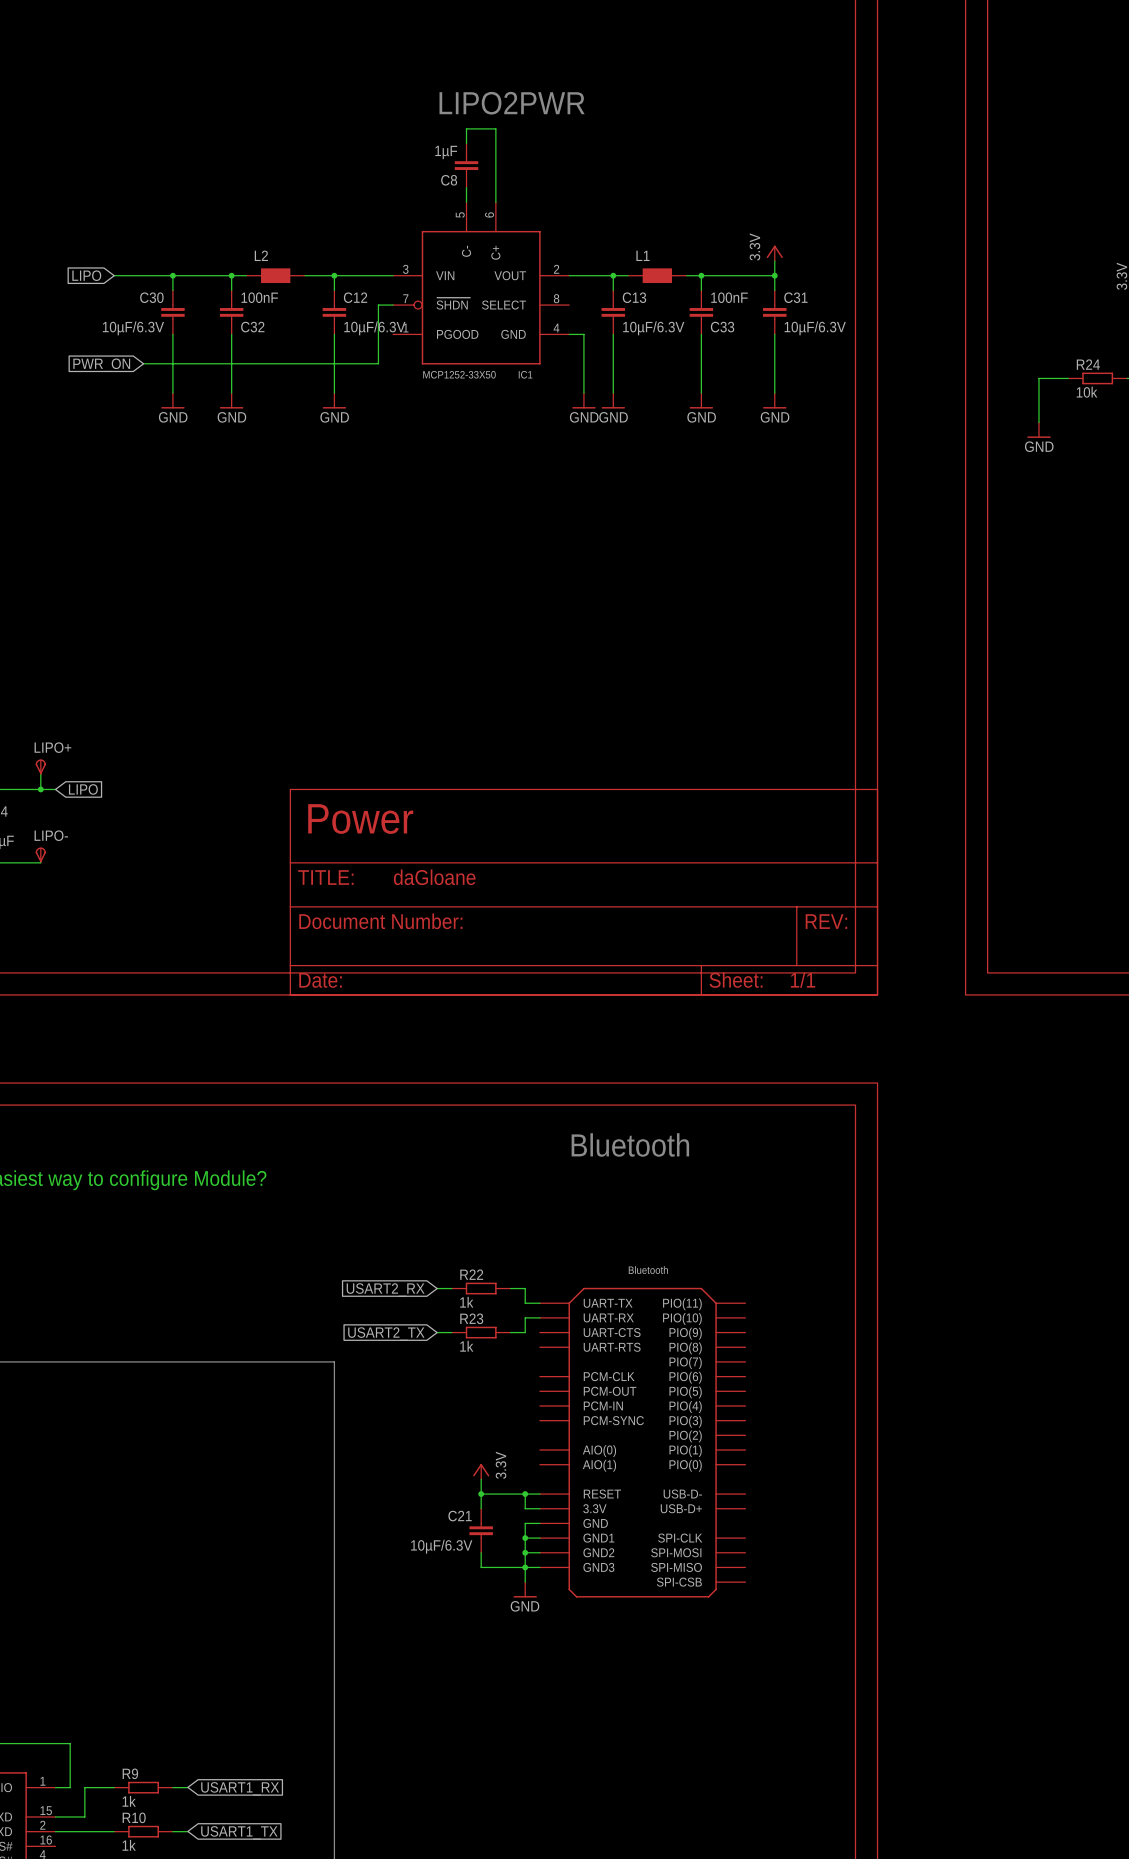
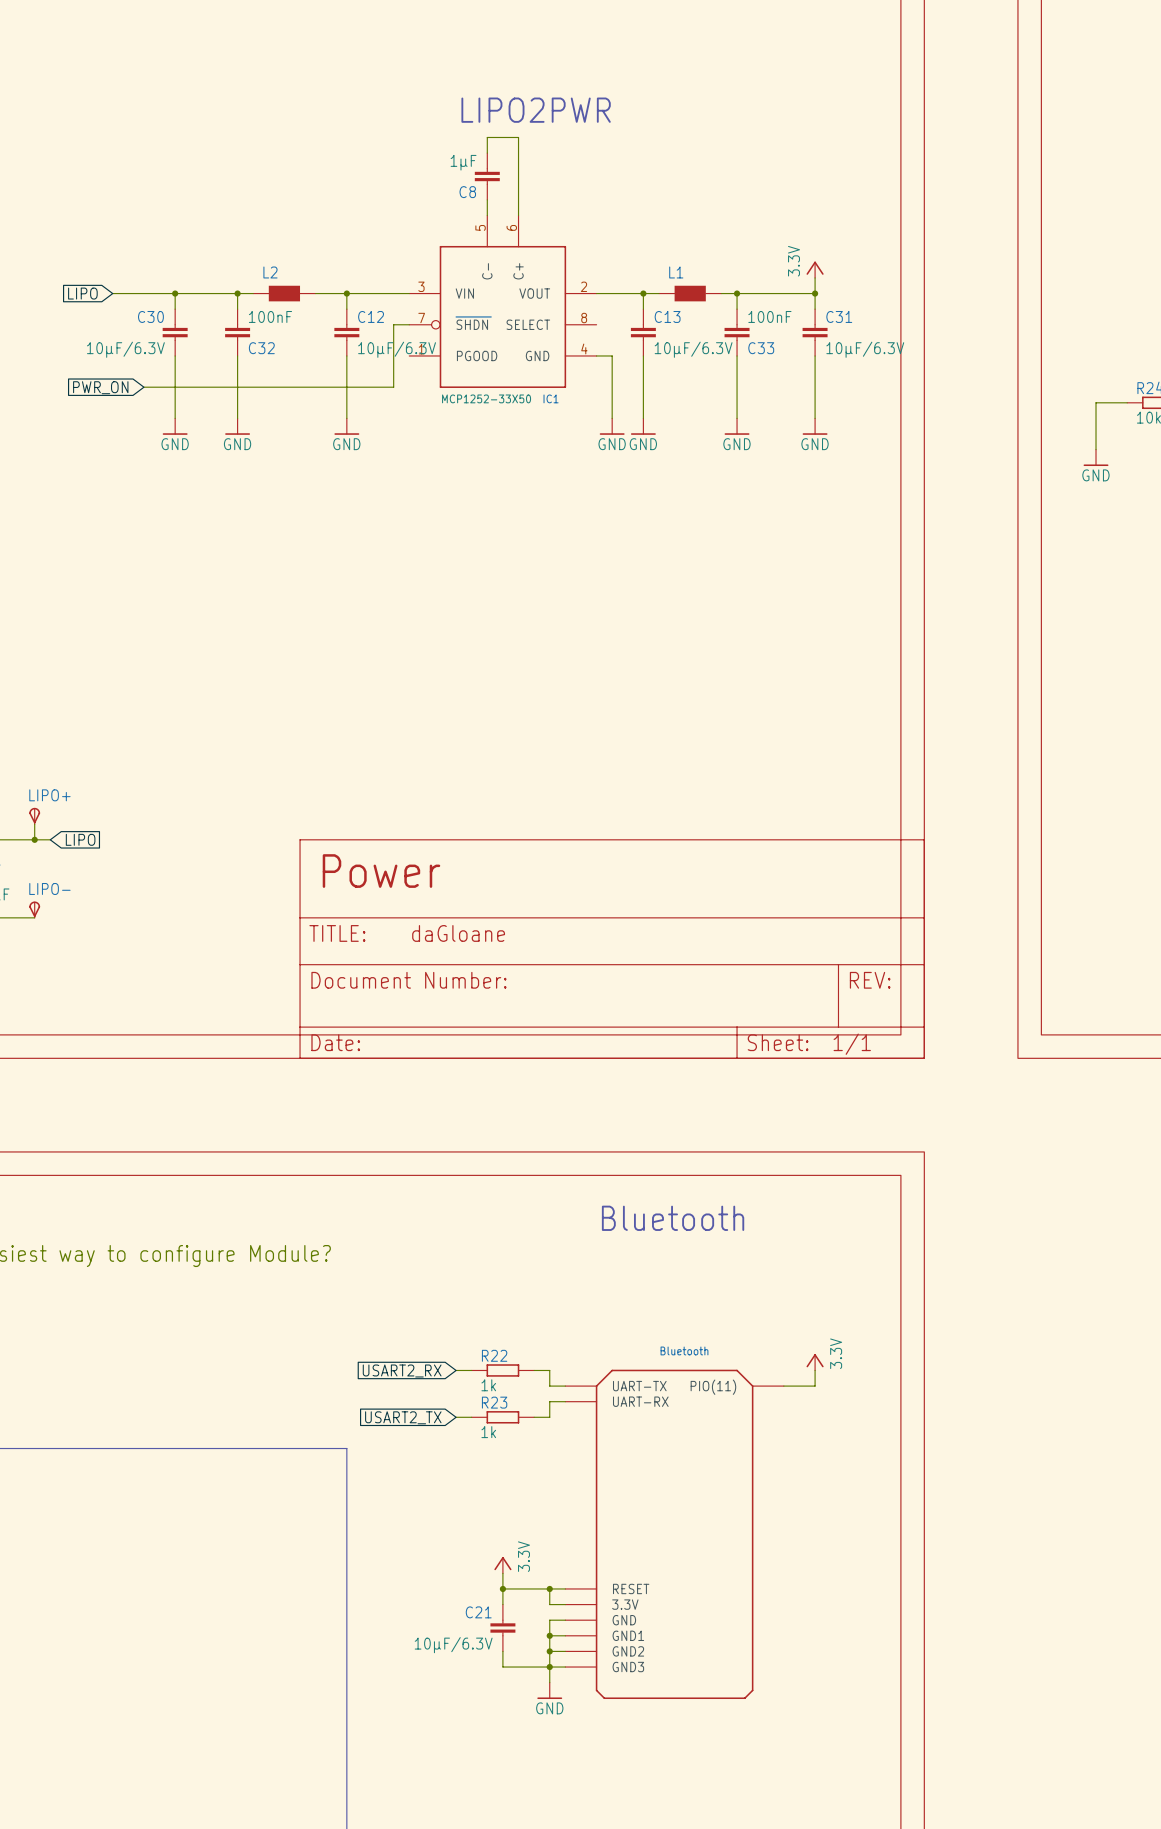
power symbol: none -> 3.3V (815, 1362)
part symbol: [539, 1287, 746, 1598] -> [565, 1369, 784, 1700]
wire: none -> (815, 1370) (815, 1386) (783, 1386)

